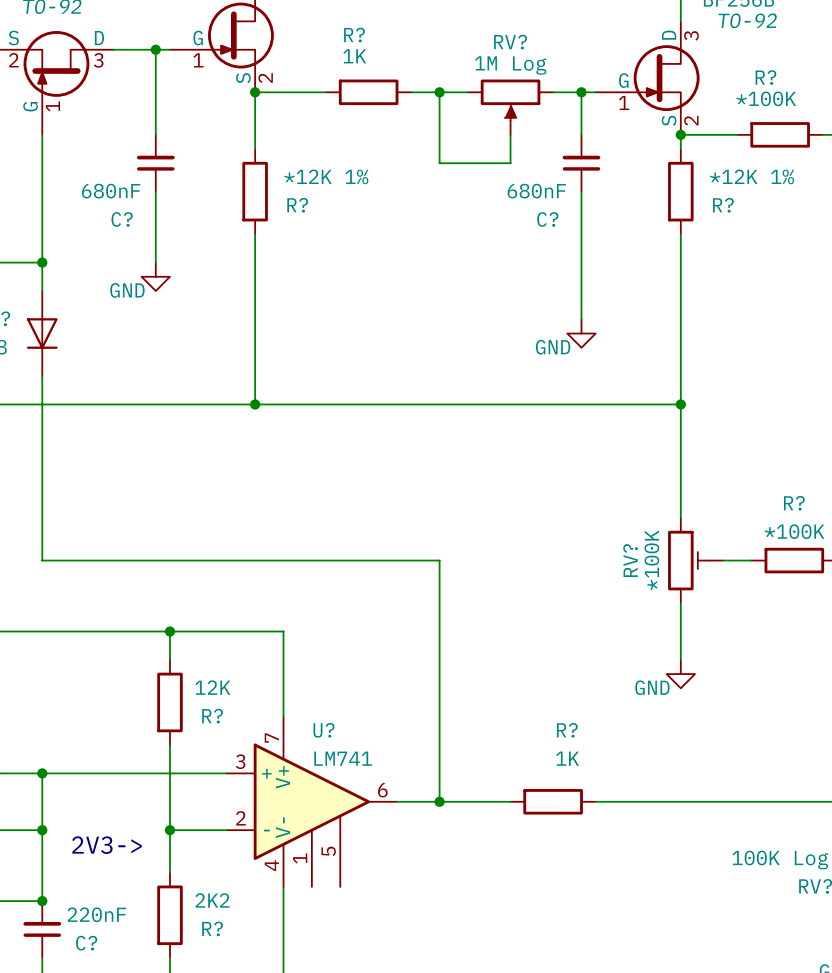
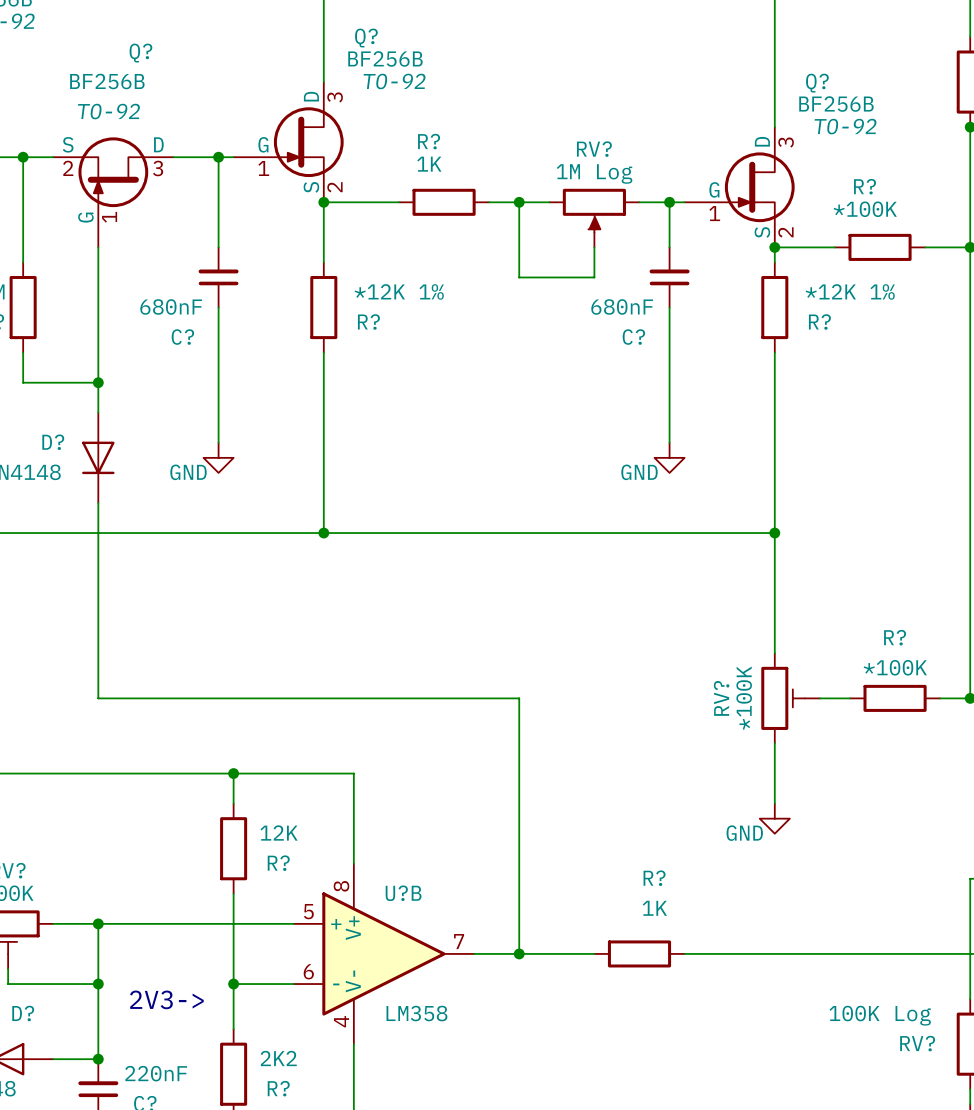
wire: none -> (218, 382) (218, 442)
power symbol position: GND (155, 276) -> GND (218, 457)
U?: LM741 (311, 801) -> none
U?B: none -> LM358 (383, 953)

